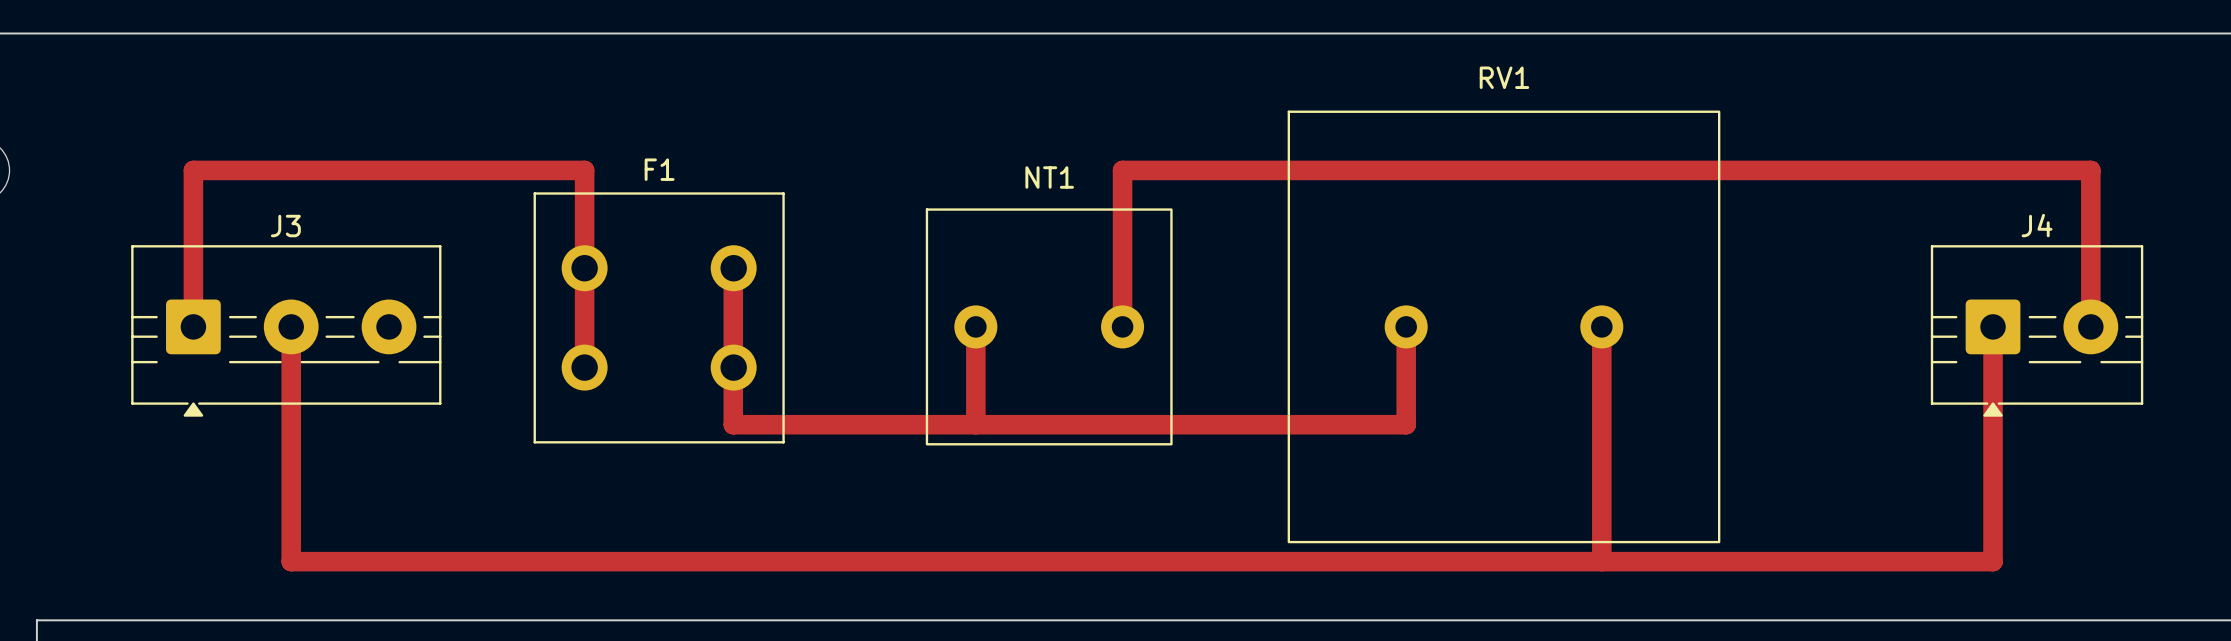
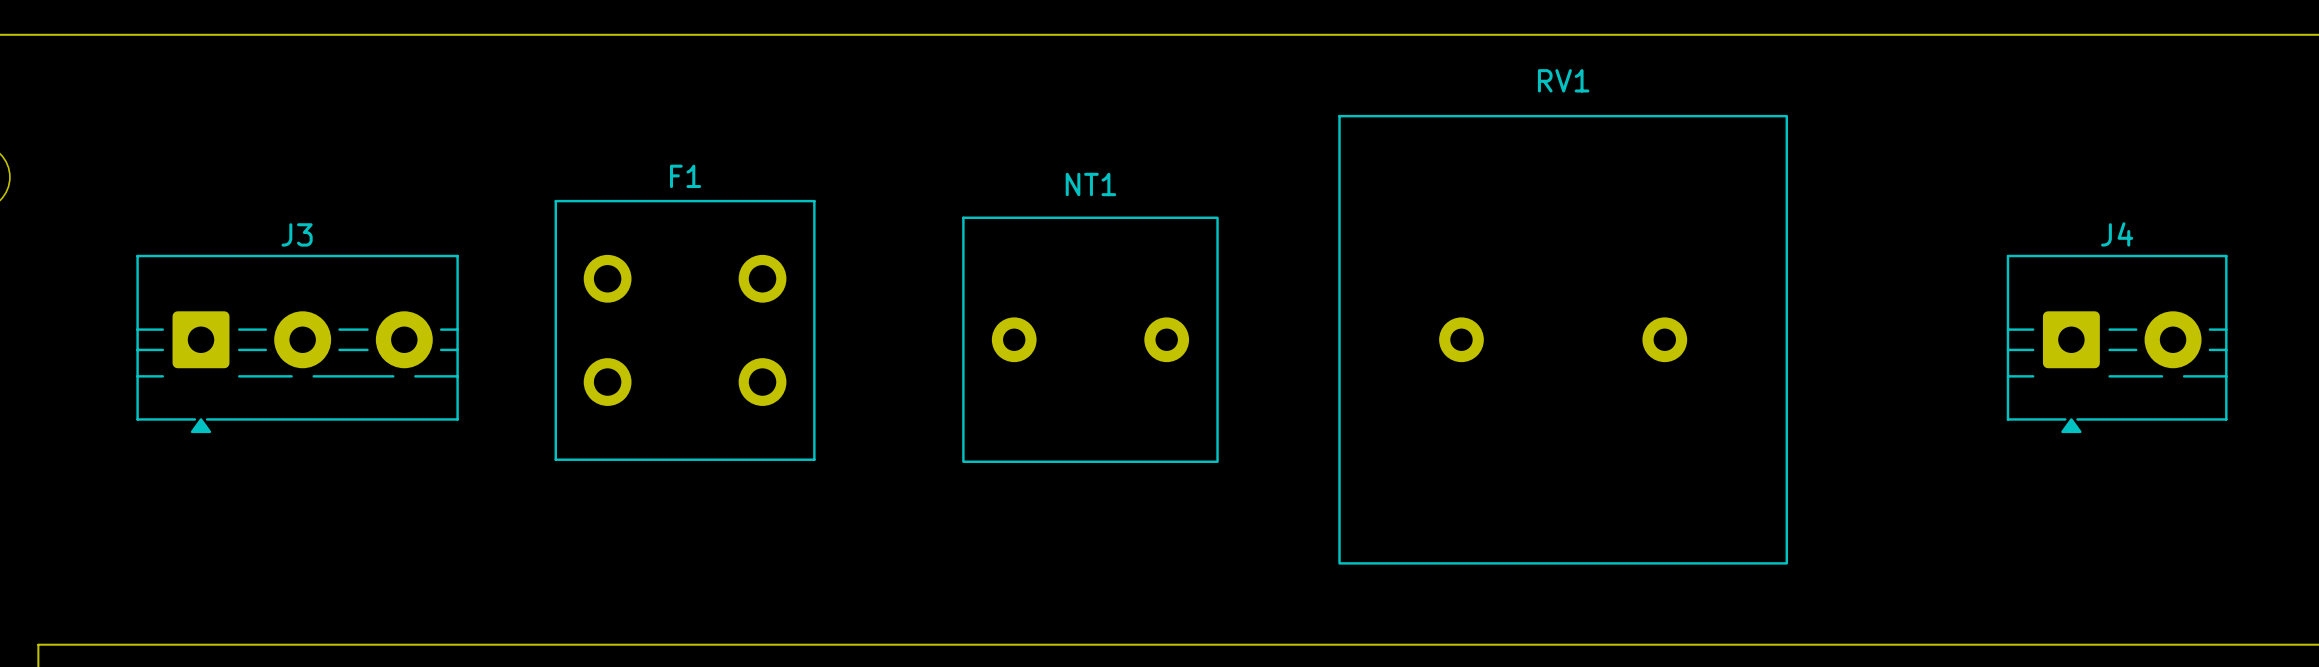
track: (733, 268) (733, 424) (1406, 424) (1406, 326) -> none
track: (193, 326) (193, 170) (584, 170) (584, 367) -> none
track: (291, 326) (291, 561) (1993, 561) (1993, 326) -> none
track: (975, 326) (975, 424) -> none
track: (1122, 326) (1122, 170) (2090, 170) (2090, 326) -> none
track: (1601, 326) (1601, 561) -> none

